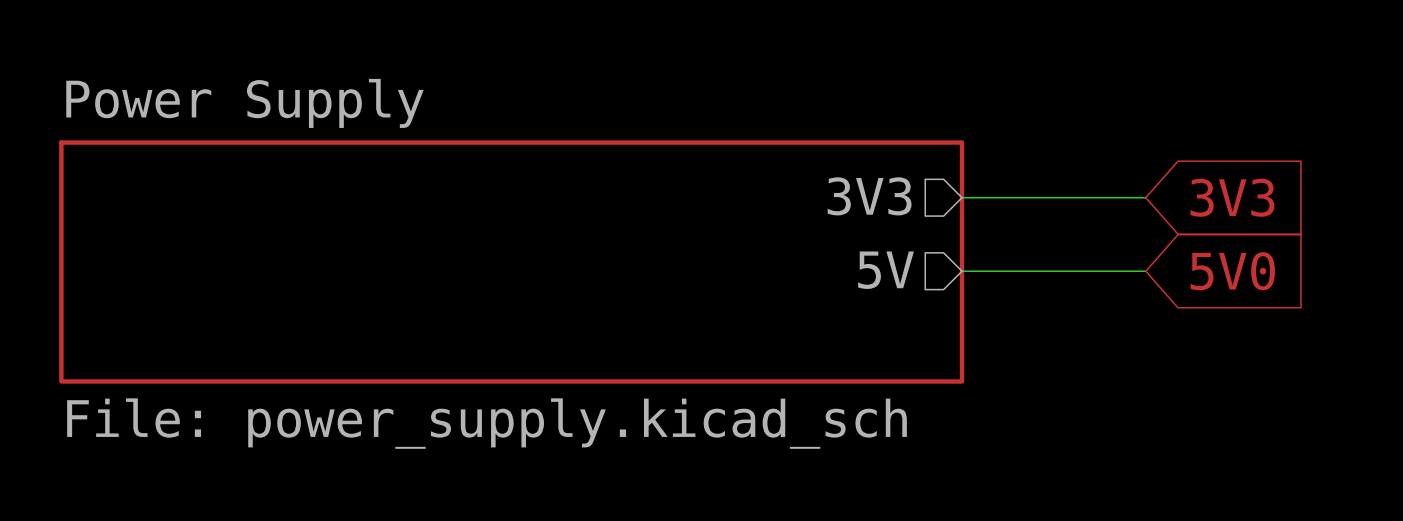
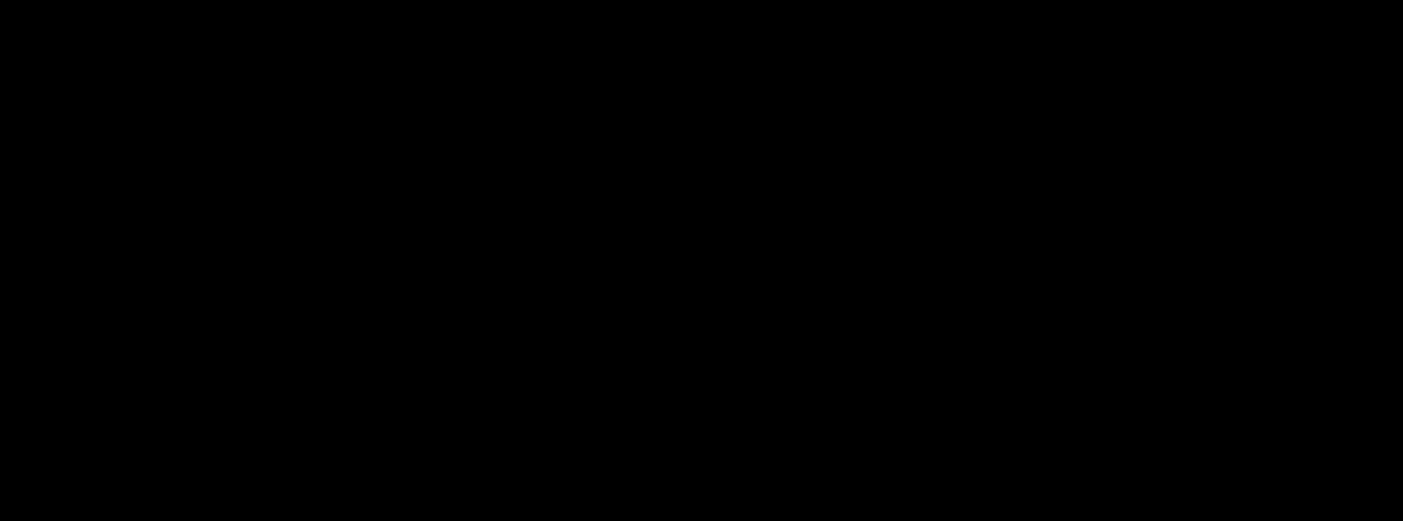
sheet pin: 3V3 (869, 196) -> none
wire: (962, 197) (1145, 197) -> none
global label: 3V3 (1232, 197) -> none
sheet Power Supply: File: power_supply.kicad_sch (511, 262) -> none
sheet pin: 5V (886, 270) -> none
wire: (962, 271) (1145, 271) -> none
global label: 5V0 (1232, 271) -> none

